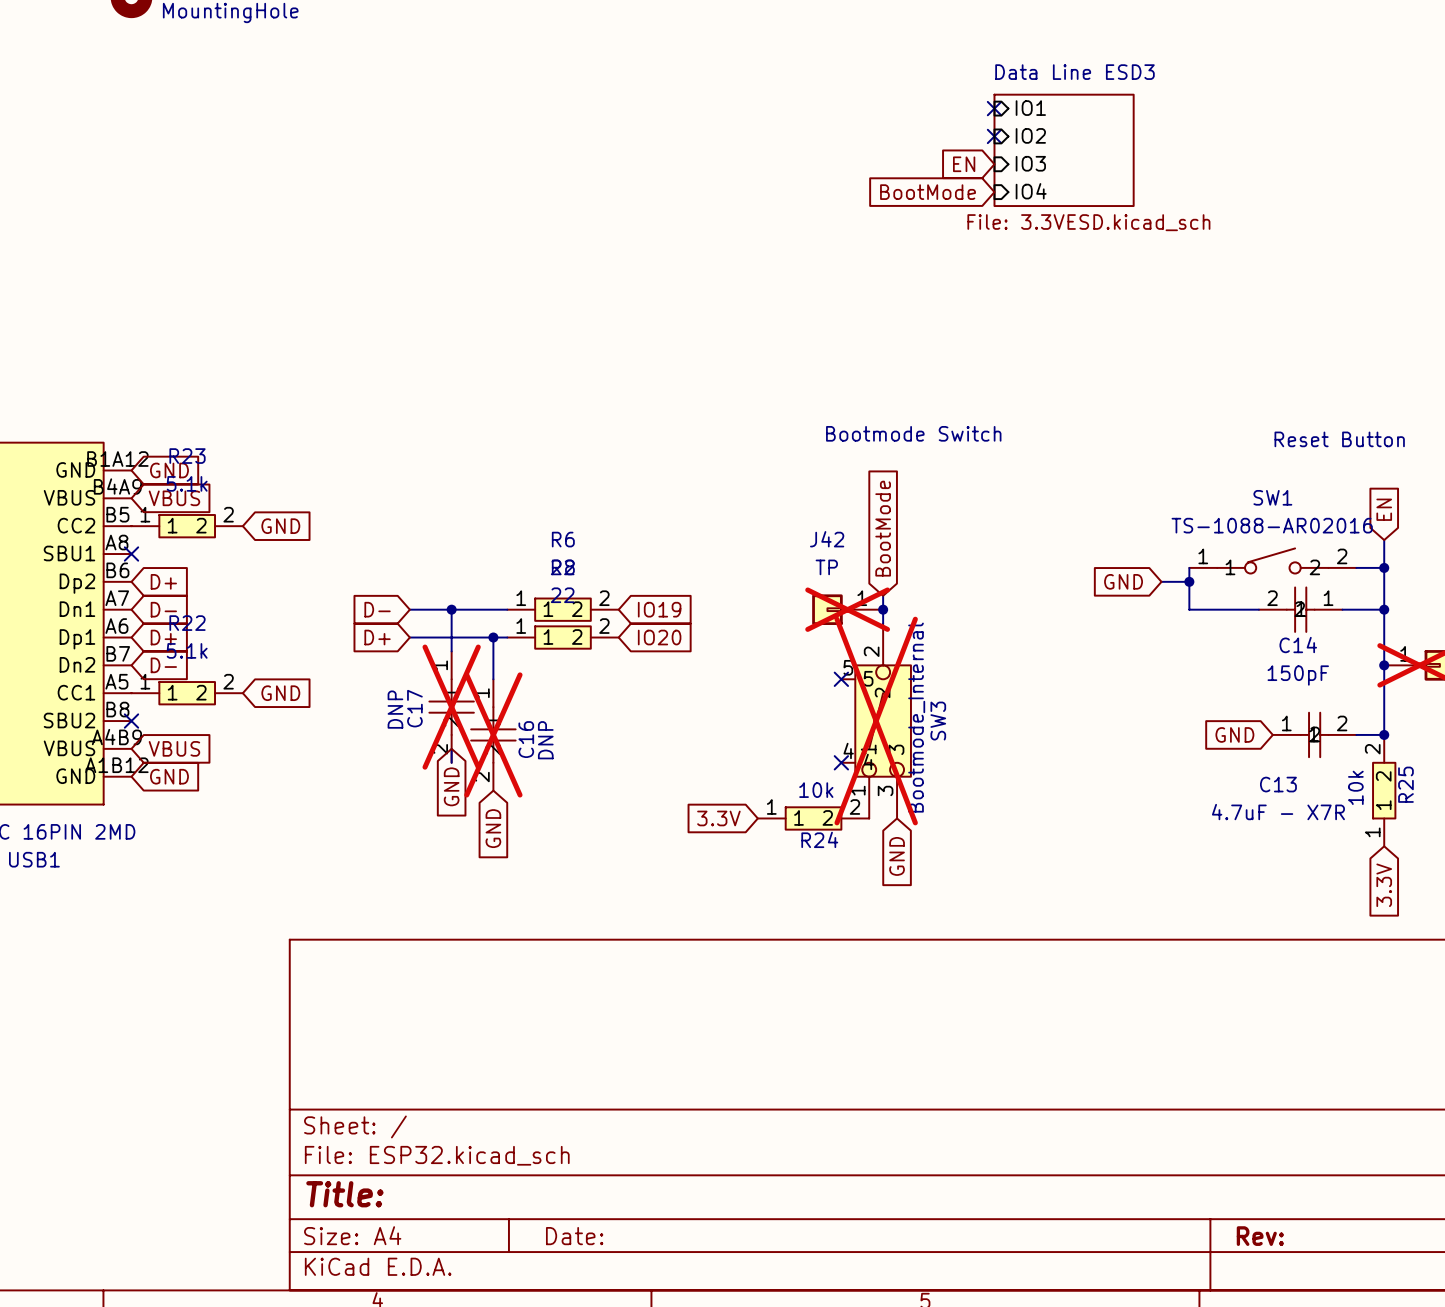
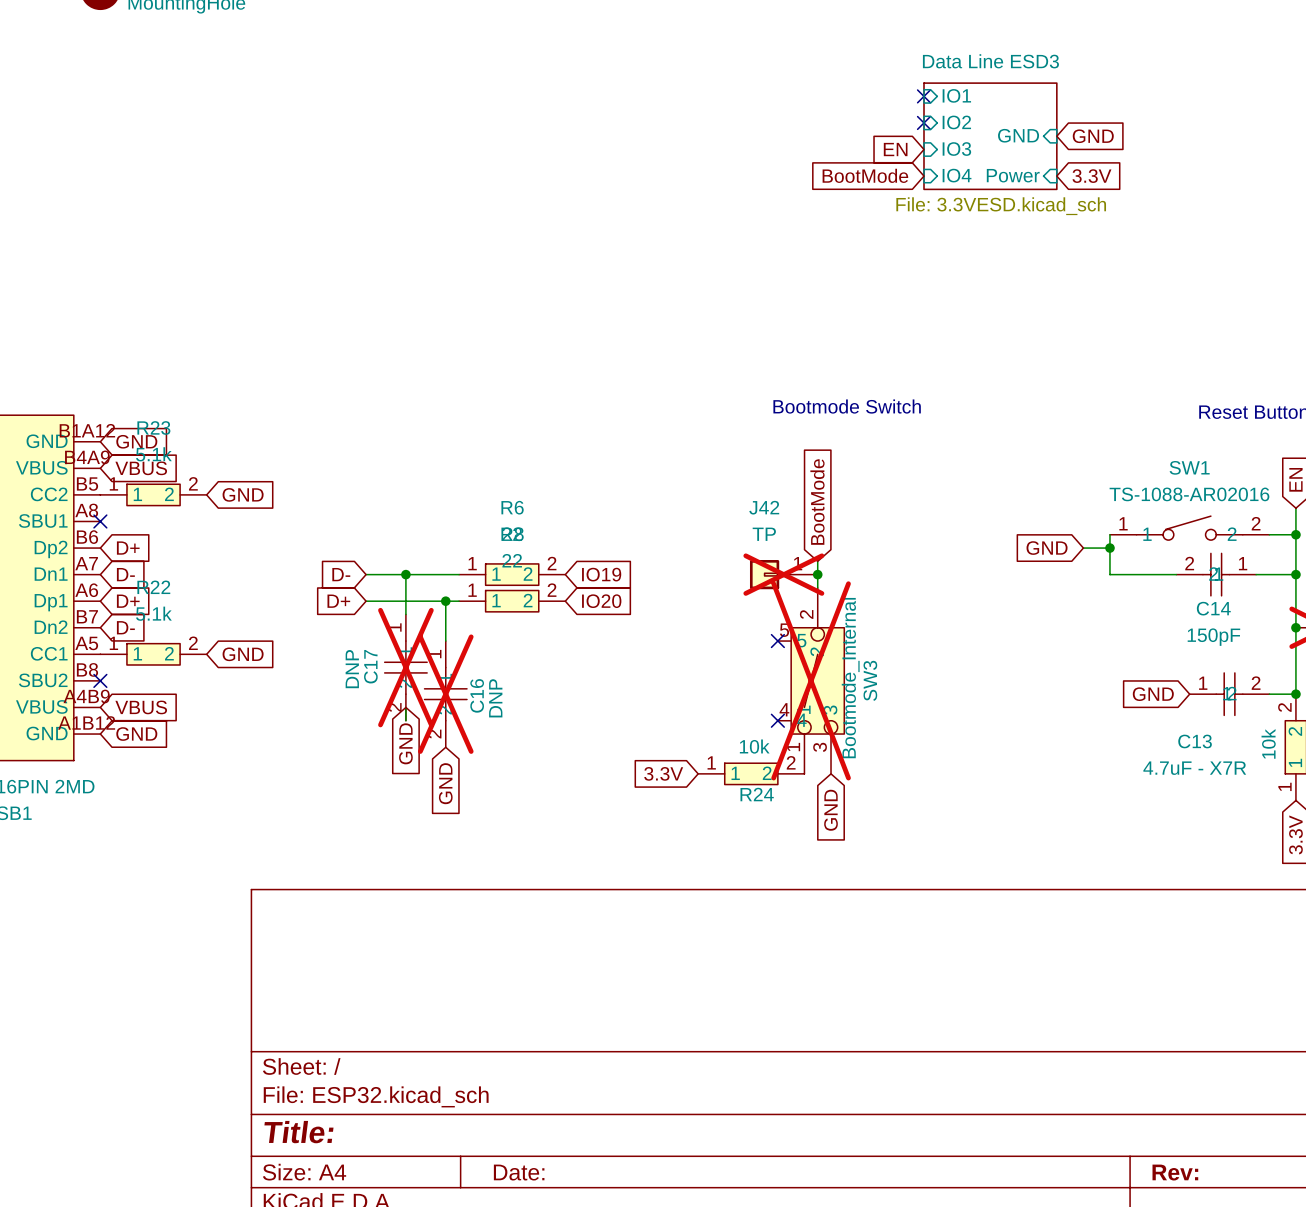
sheet pin: none -> GND (1018, 135)
global label: none -> GND (1093, 136)
sheet pin: none -> Power (1013, 175)
global label: none -> 3.3V (1091, 176)

